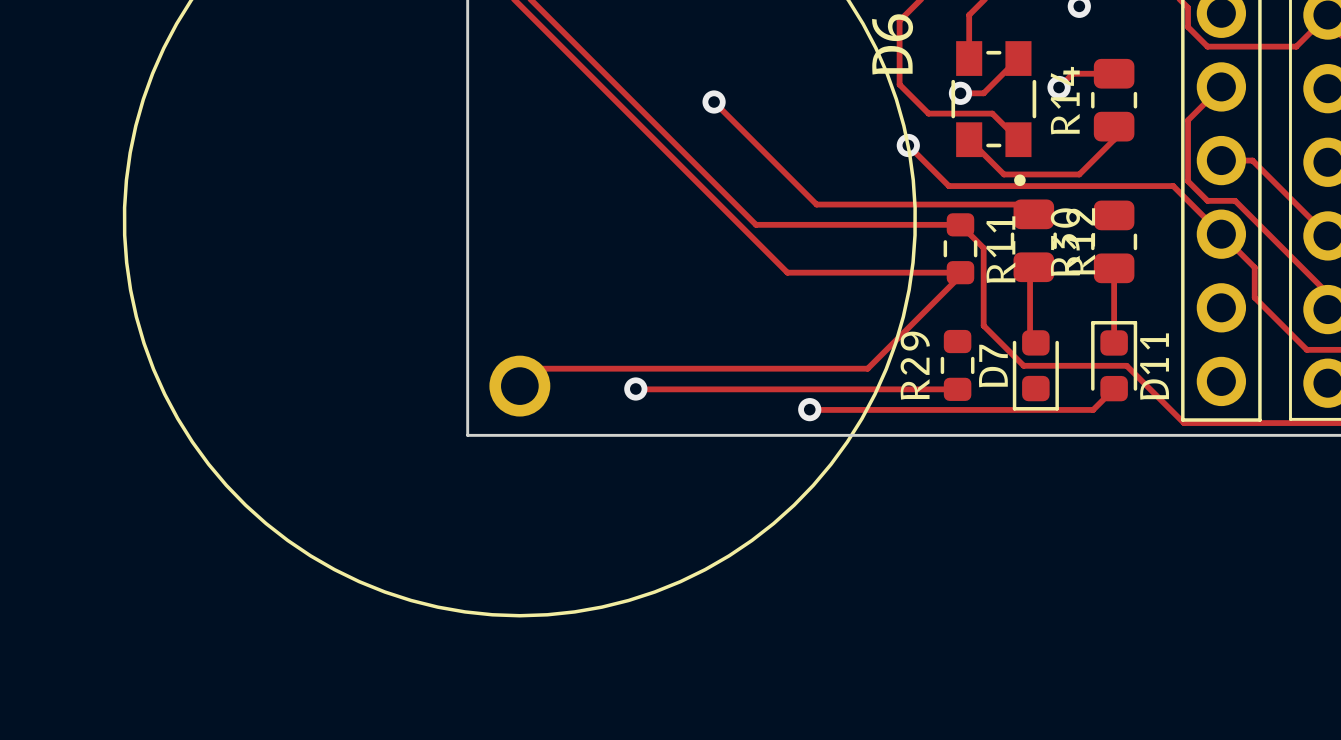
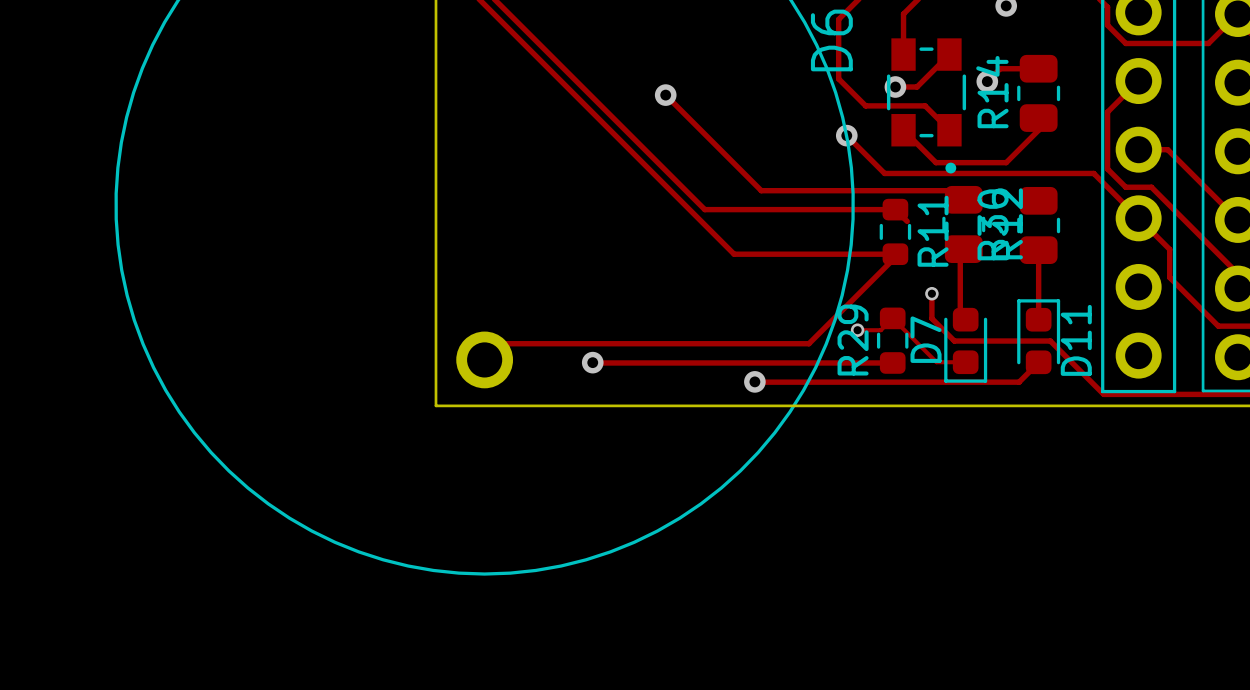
track: (973, 237) (983, 248) (983, 325) (999, 341) -> (931, 293) (931, 318)
via: none -> (931, 293)
track: none -> (857, 330) (880, 330) (892, 318) (936, 362) (965, 362)
via: none -> (857, 330)

